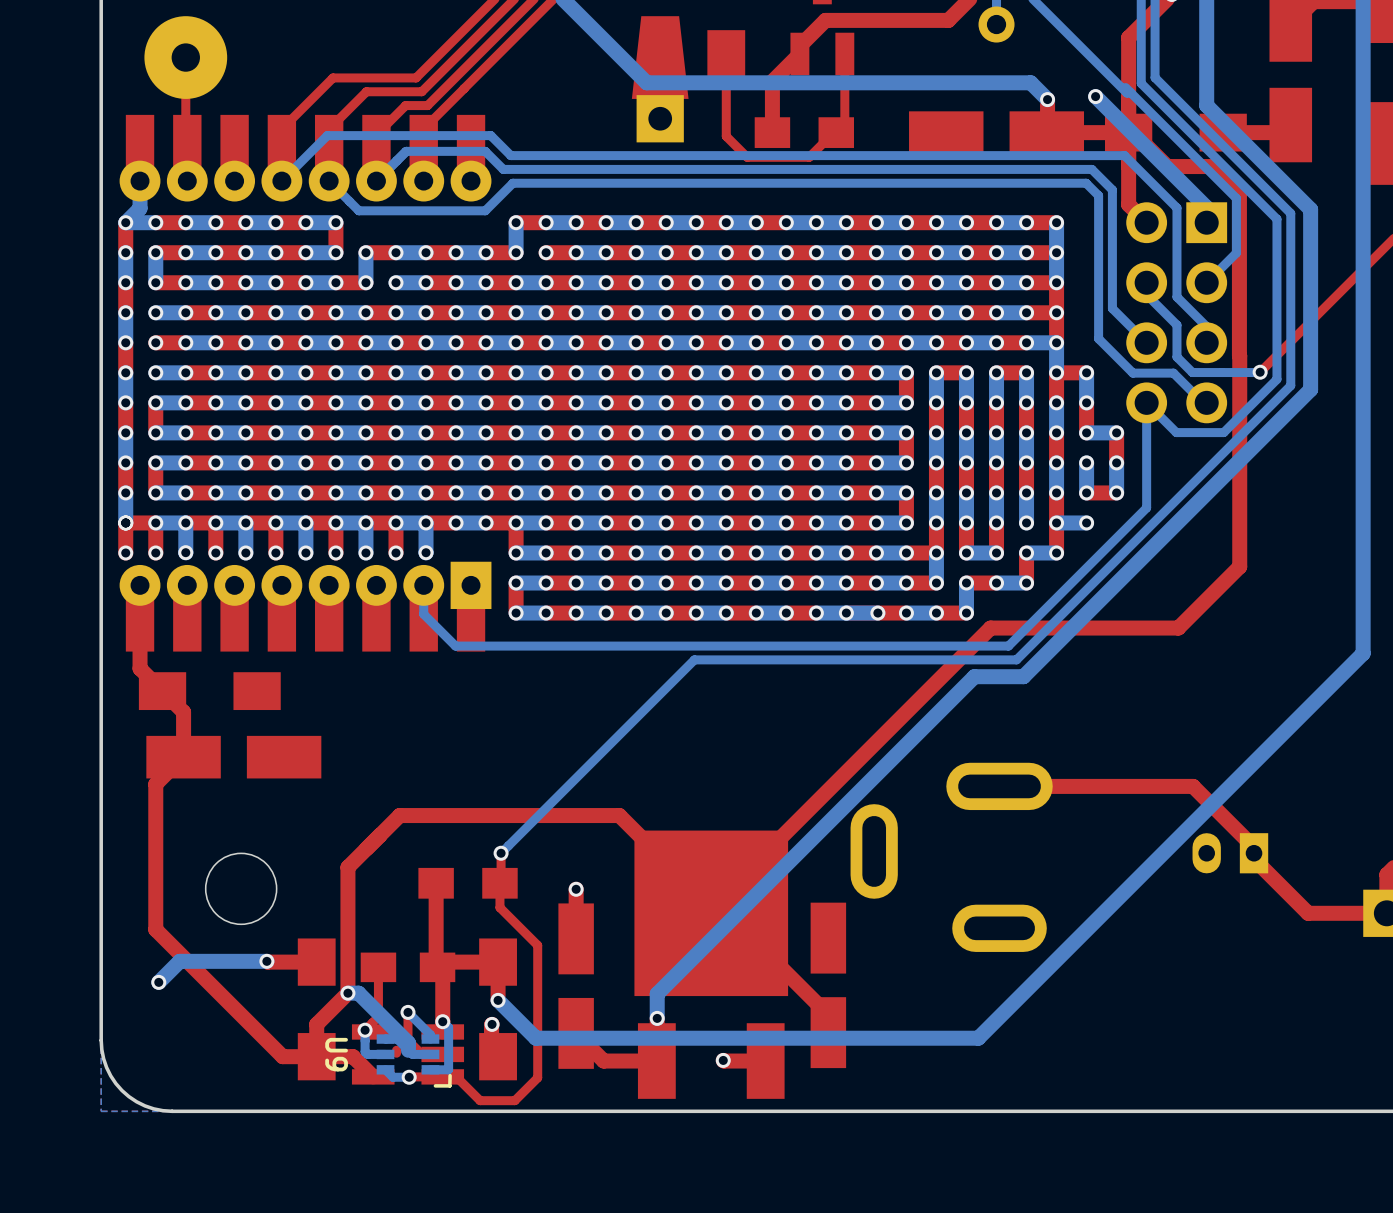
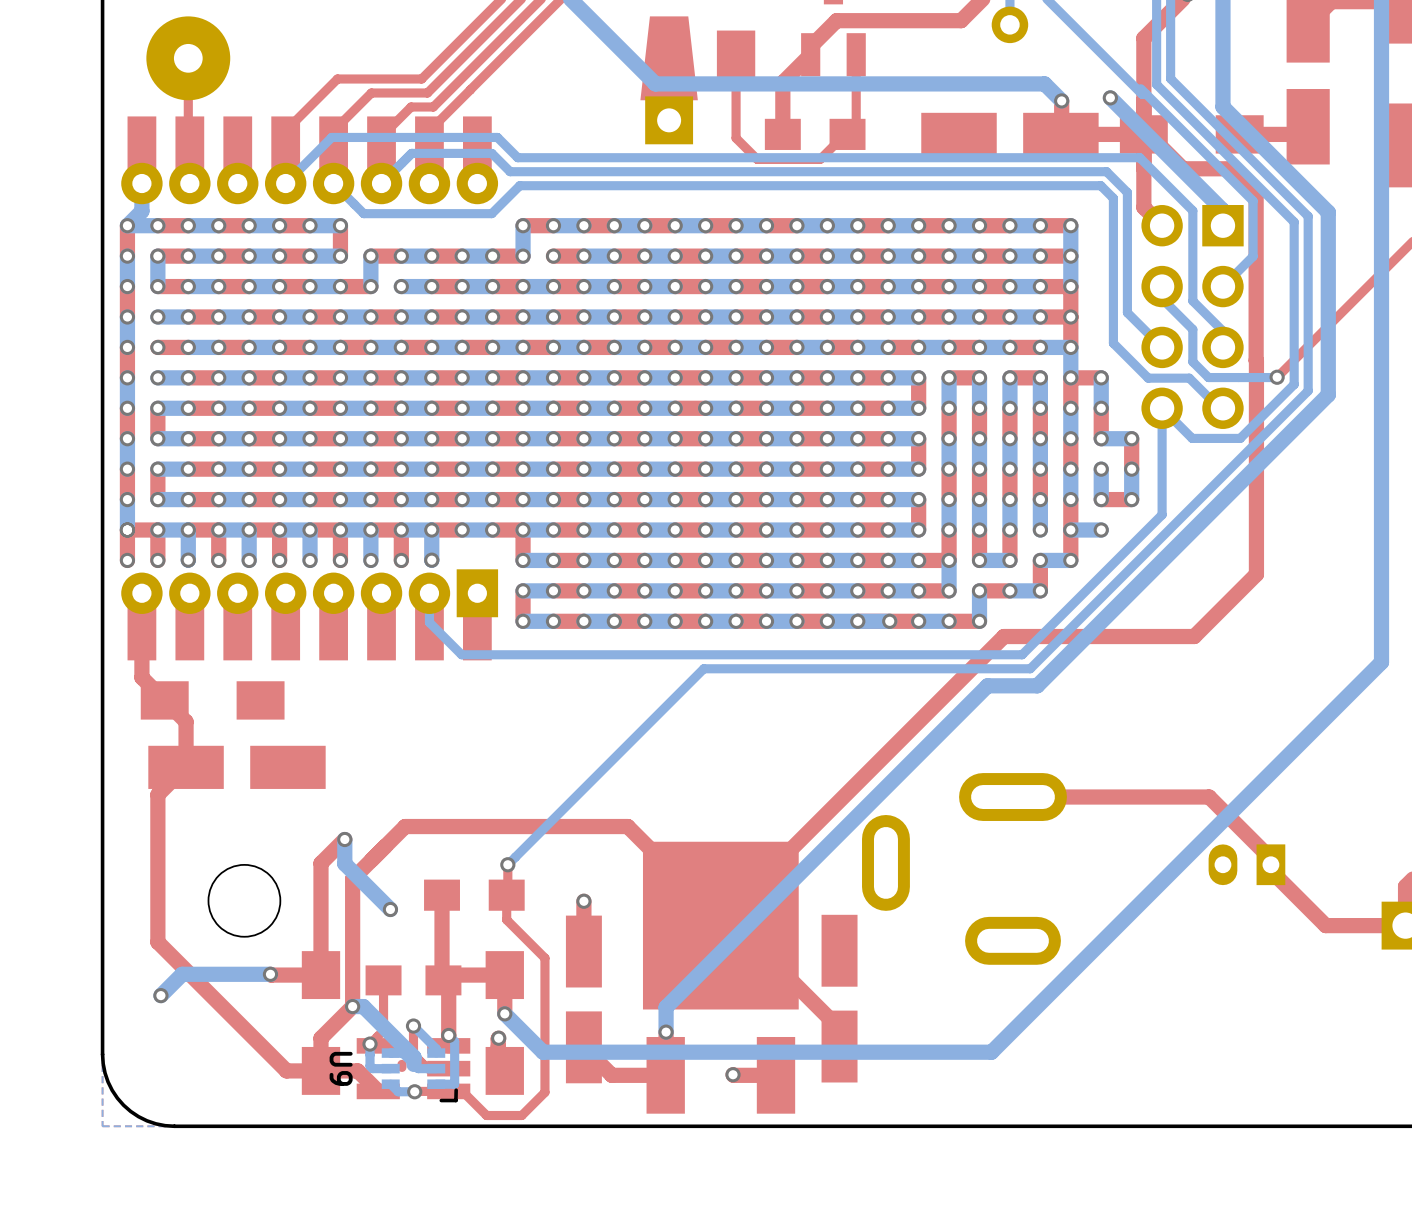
top track: none -> (344, 839) (320, 863) (320, 975)
bottom track: none -> (344, 839) (344, 863) (390, 909)
via: none -> (344, 839)
via: none -> (390, 909)

